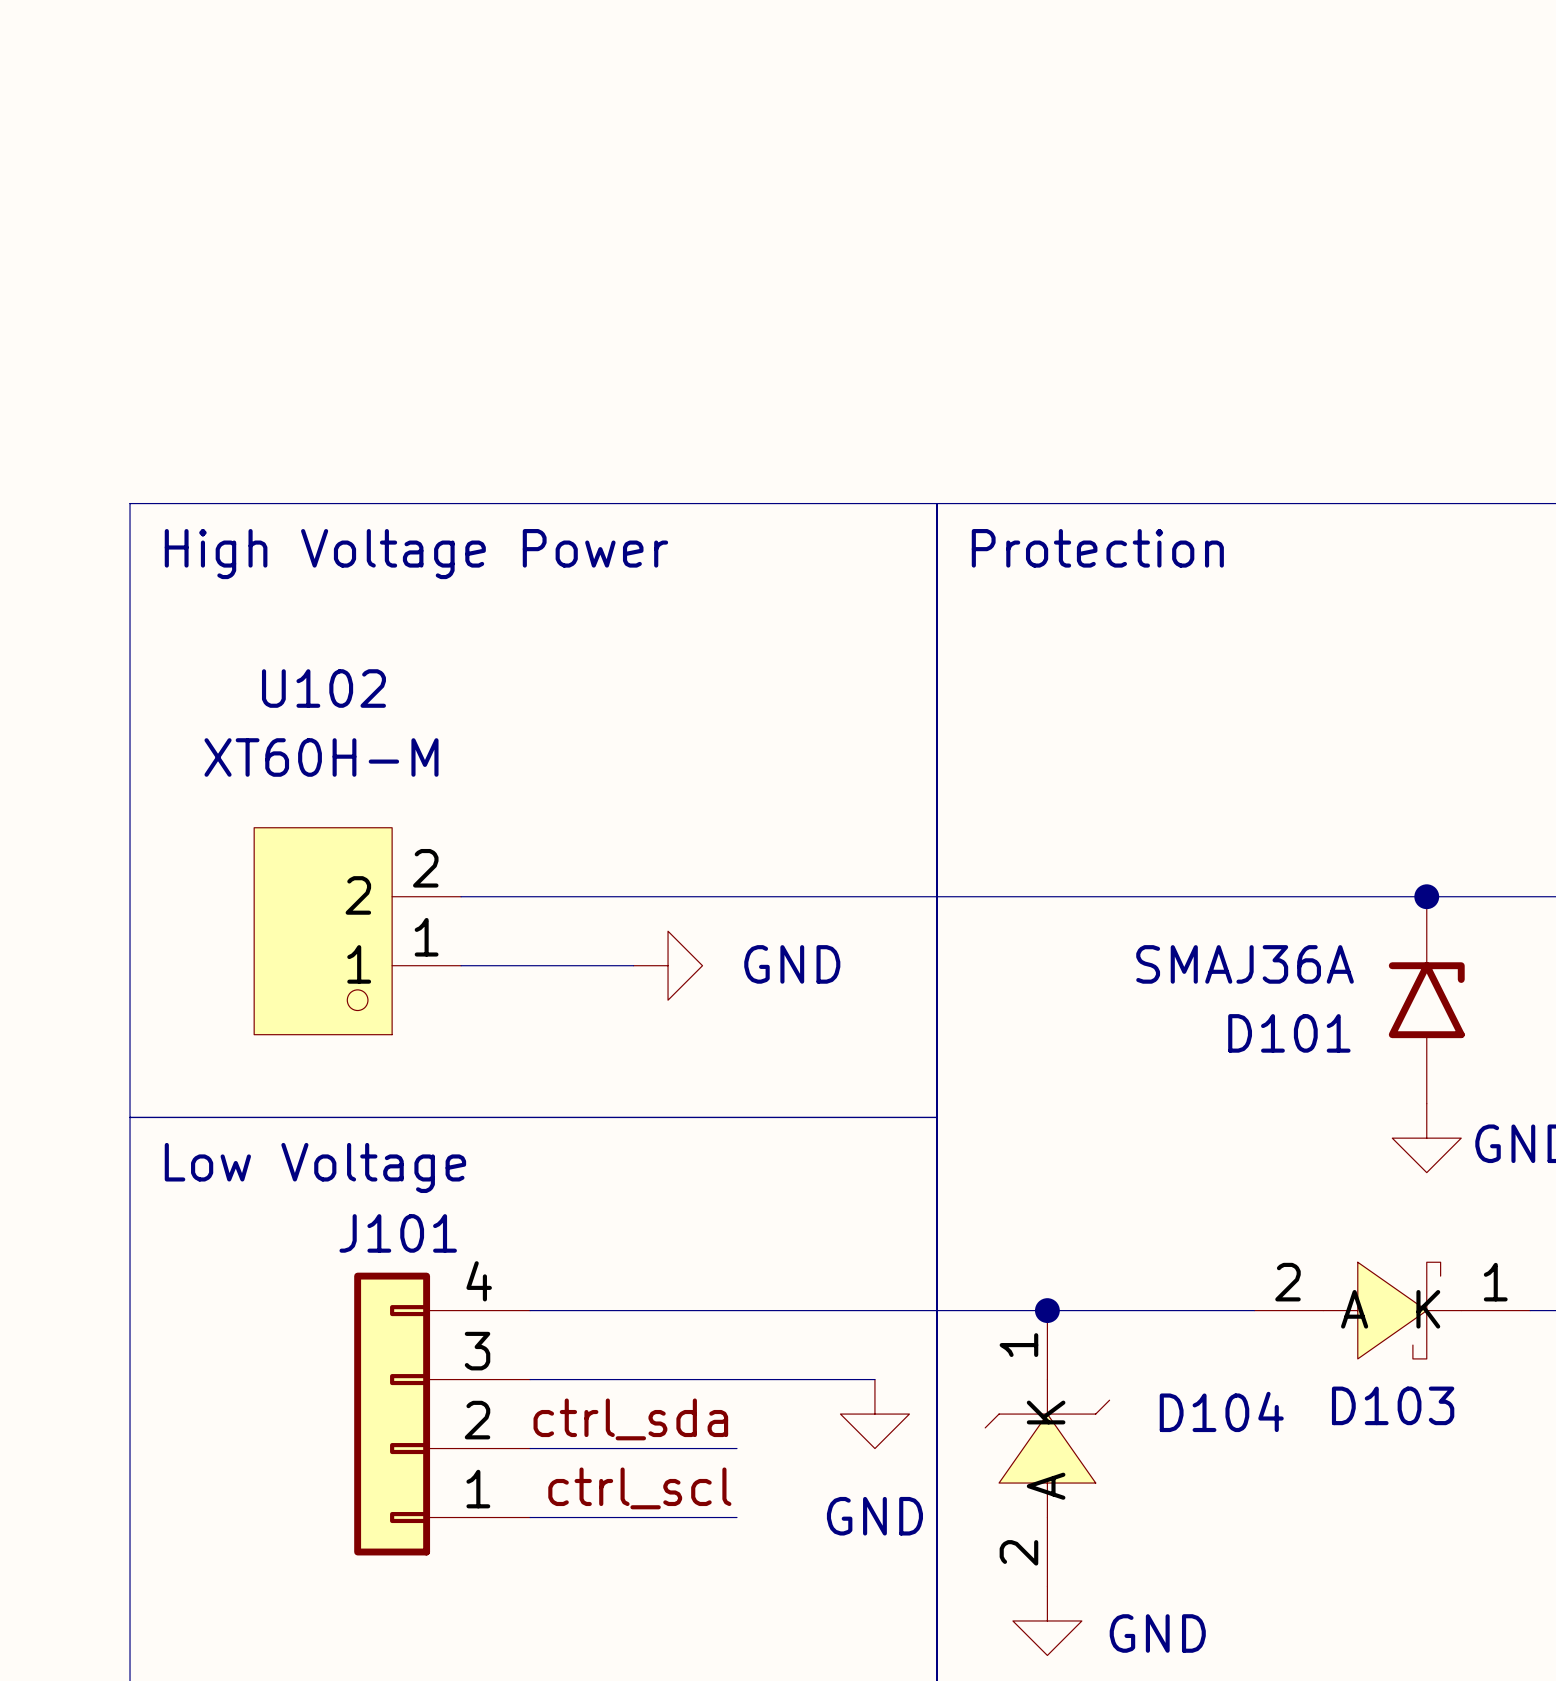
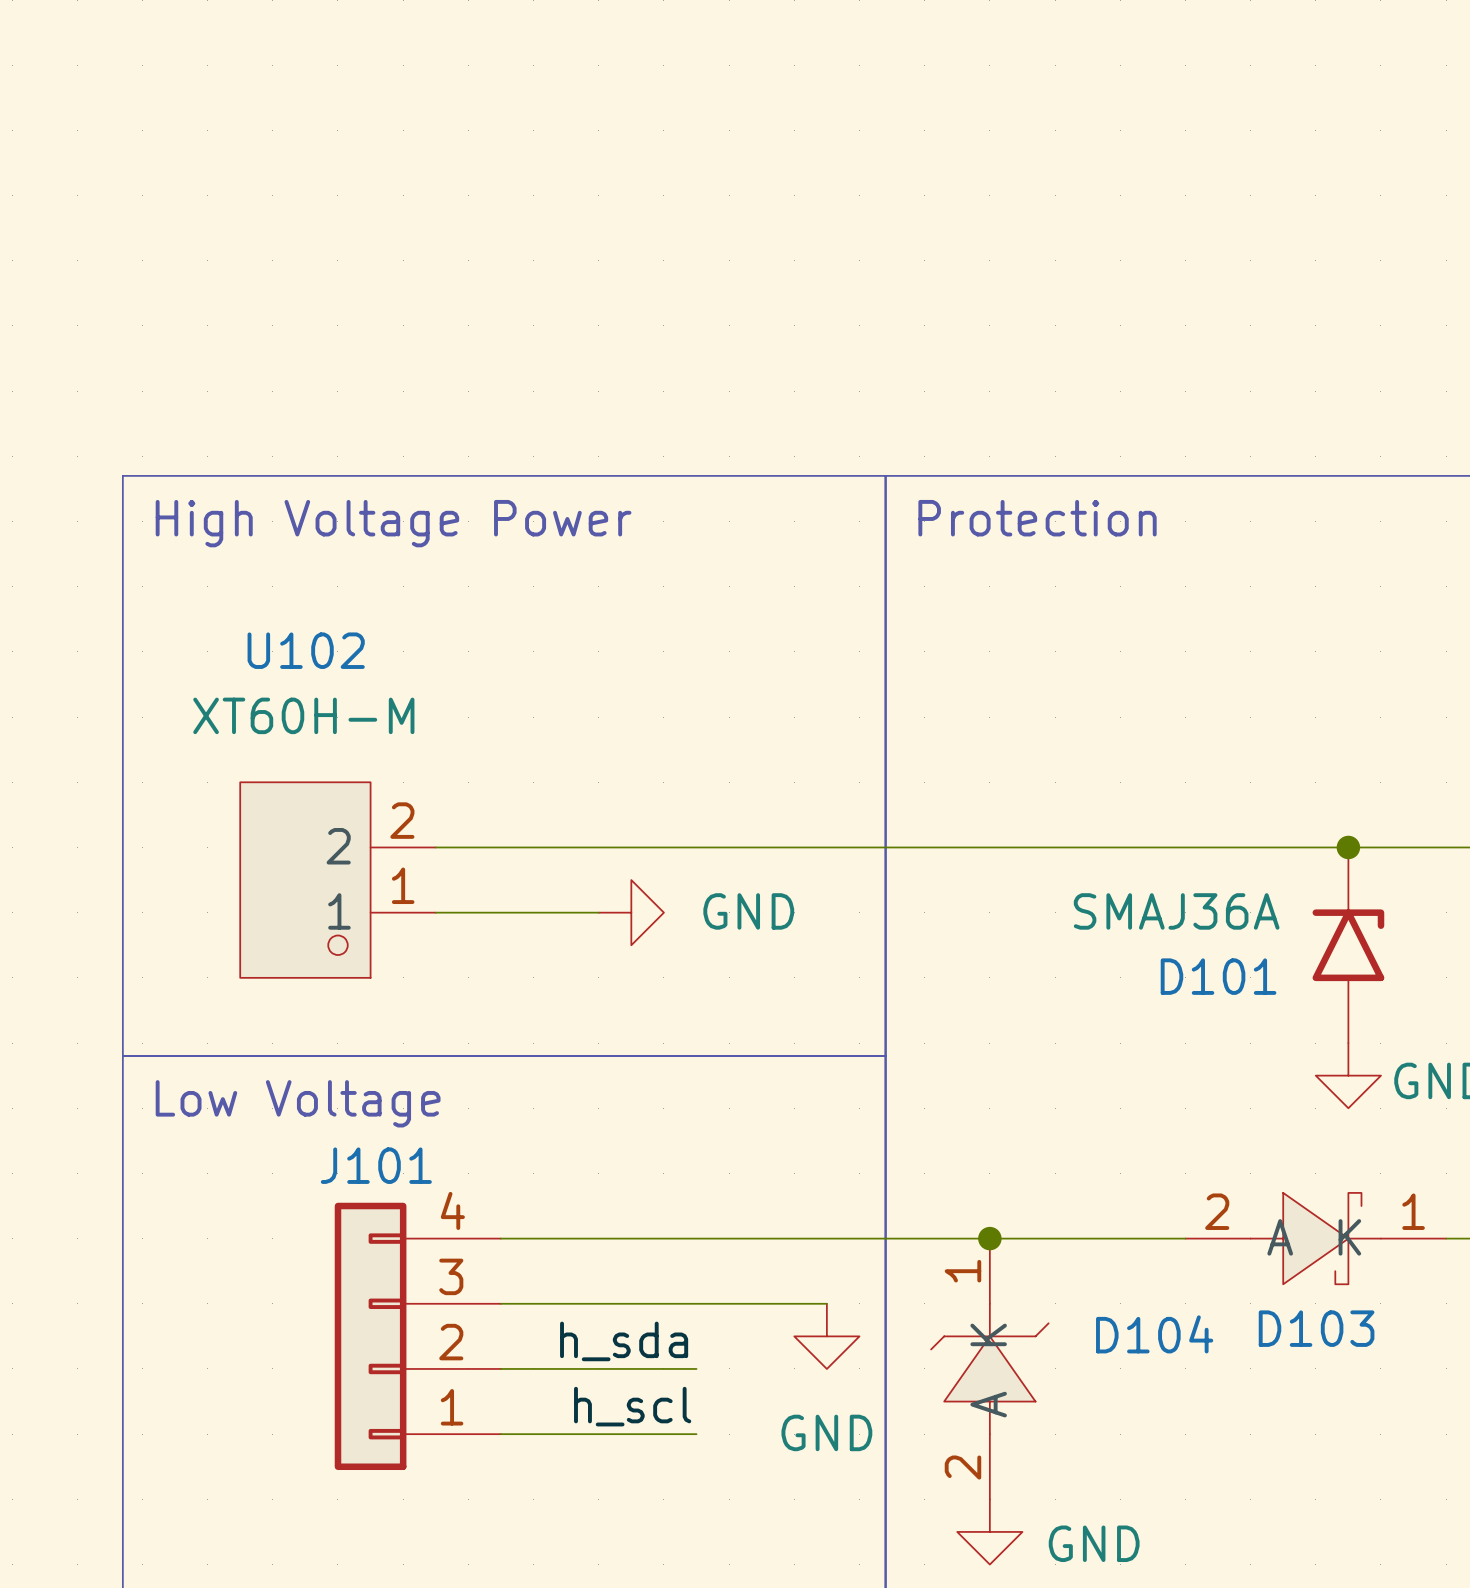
label: ctrl_sda (630, 1419) -> h_sda (624, 1341)
label: ctrl_scl (639, 1488) -> h_scl (632, 1406)

